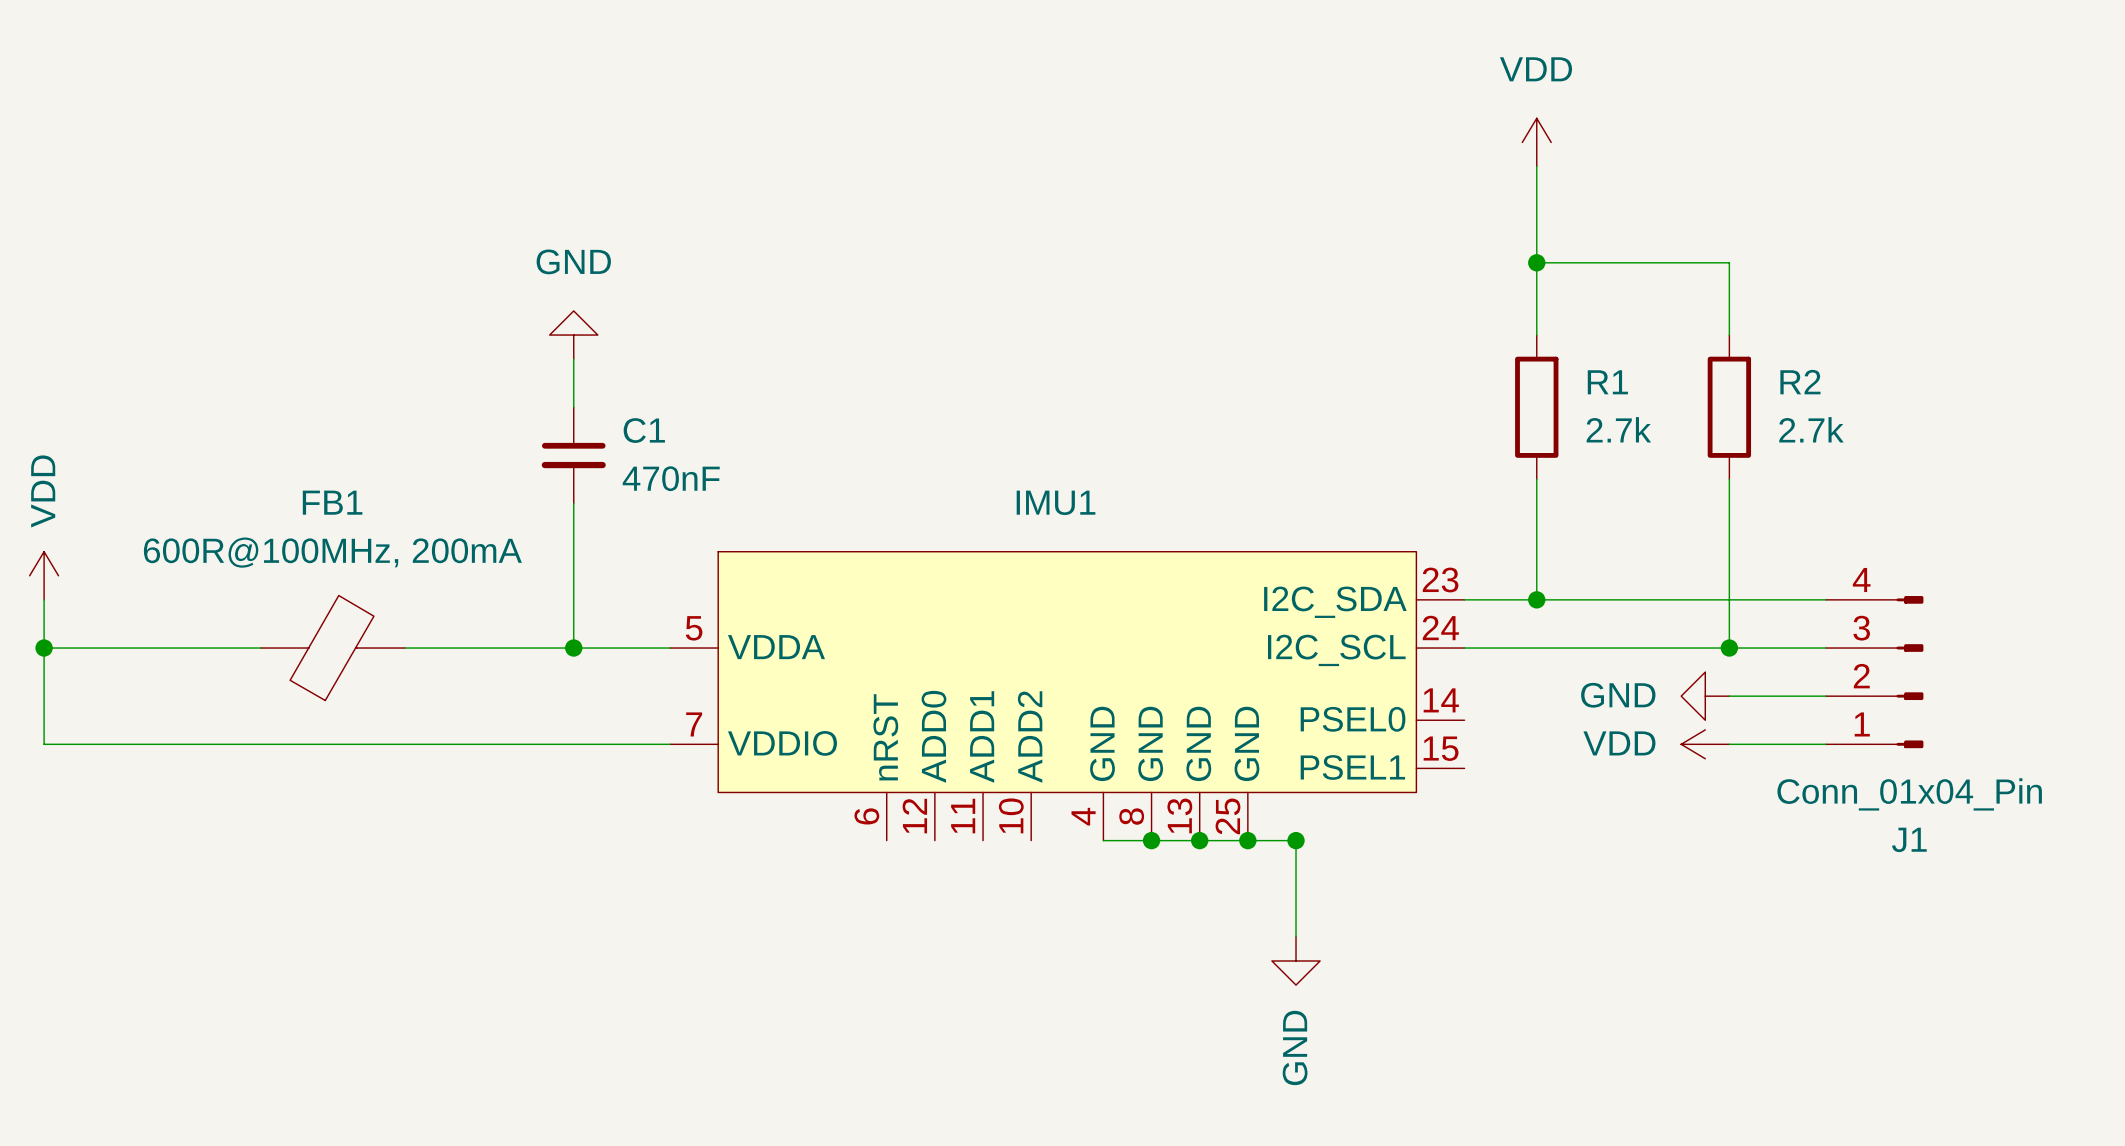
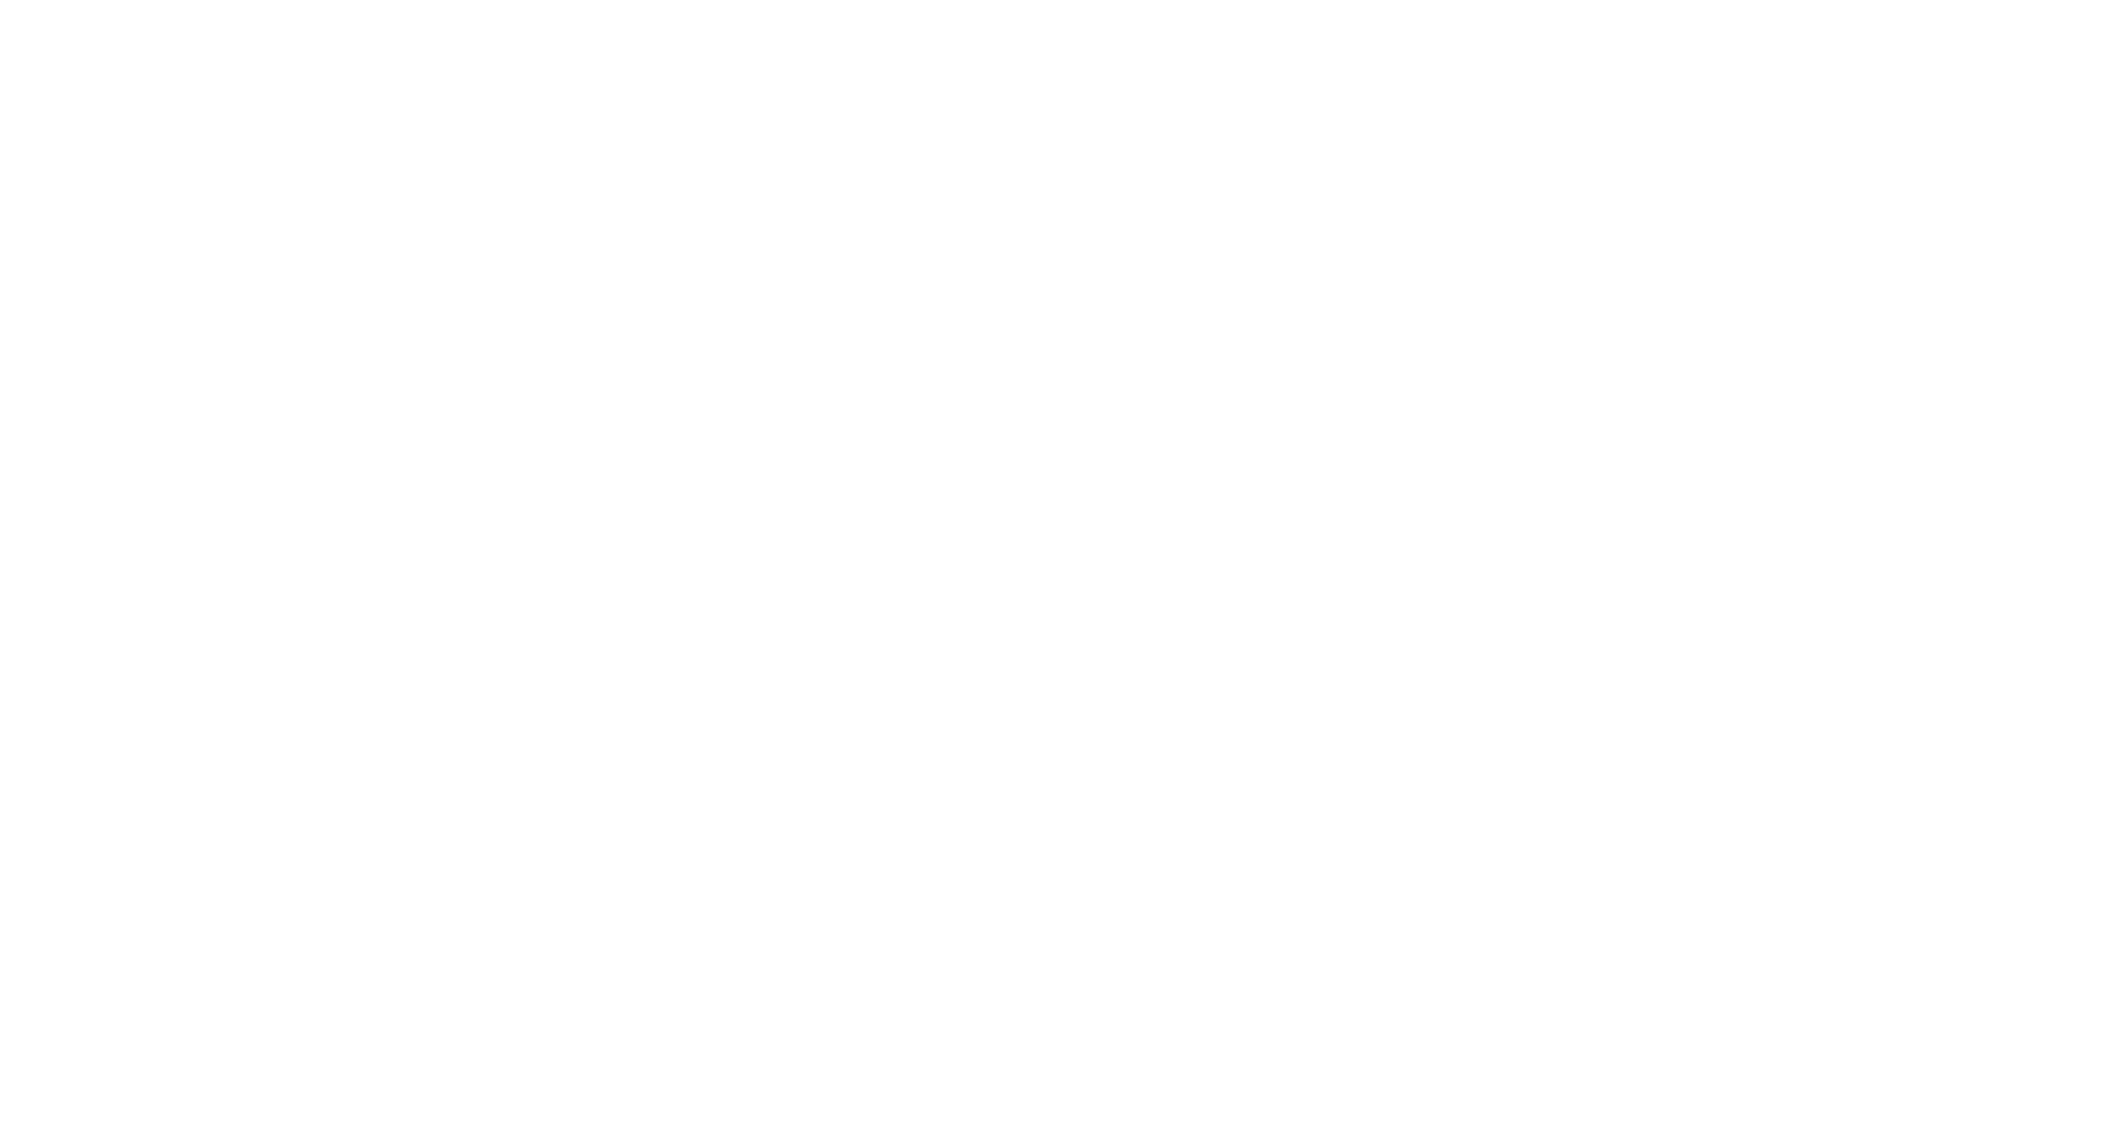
power symbol: VDD (1536, 142) -> none
wire: (1536, 166) (1536, 335) -> none
wire: (1536, 262) (1729, 262) (1729, 335) -> none
junction: (1536, 262) -> none
power symbol: GND (573, 335) -> none
wire: (573, 359) (573, 407) -> none
R1: 2.7k (1536, 407) -> none
R2: 2.7k (1729, 407) -> none
C1: 470nF (573, 455) -> none
wire: (1536, 479) (1536, 599) -> none
wire: (1729, 479) (1729, 648) -> none
wire: (573, 503) (573, 648) -> none
power symbol: VDD (44, 575) -> none
wire: (44, 599) (44, 744) (670, 744) -> none
wire: (1464, 599) (1825, 599) -> none
junction: (1536, 599) -> none
wire: (44, 648) (260, 648) -> none
junction: (44, 648) -> none
FB1: 600R@100MHz, 200mA (332, 648) -> none
wire: (405, 648) (670, 648) -> none
junction: (573, 648) -> none
wire: (1464, 648) (1825, 648) -> none
junction: (1729, 648) -> none
J1: Conn_01x04_Pin (1874, 672) -> none
IMU1: (1067, 696) -> none
power symbol: GND (1705, 696) -> none
wire: (1729, 696) (1825, 696) -> none
power symbol: VDD (1705, 744) -> none
wire: (1729, 744) (1825, 744) -> none
wire: (1296, 839) (1296, 936) -> none
wire: (1103, 840) (1296, 840) -> none
junction: (1151, 840) -> none
junction: (1199, 840) -> none
junction: (1247, 840) -> none
junction: (1296, 840) -> none
power symbol: GND (1296, 960) -> none

